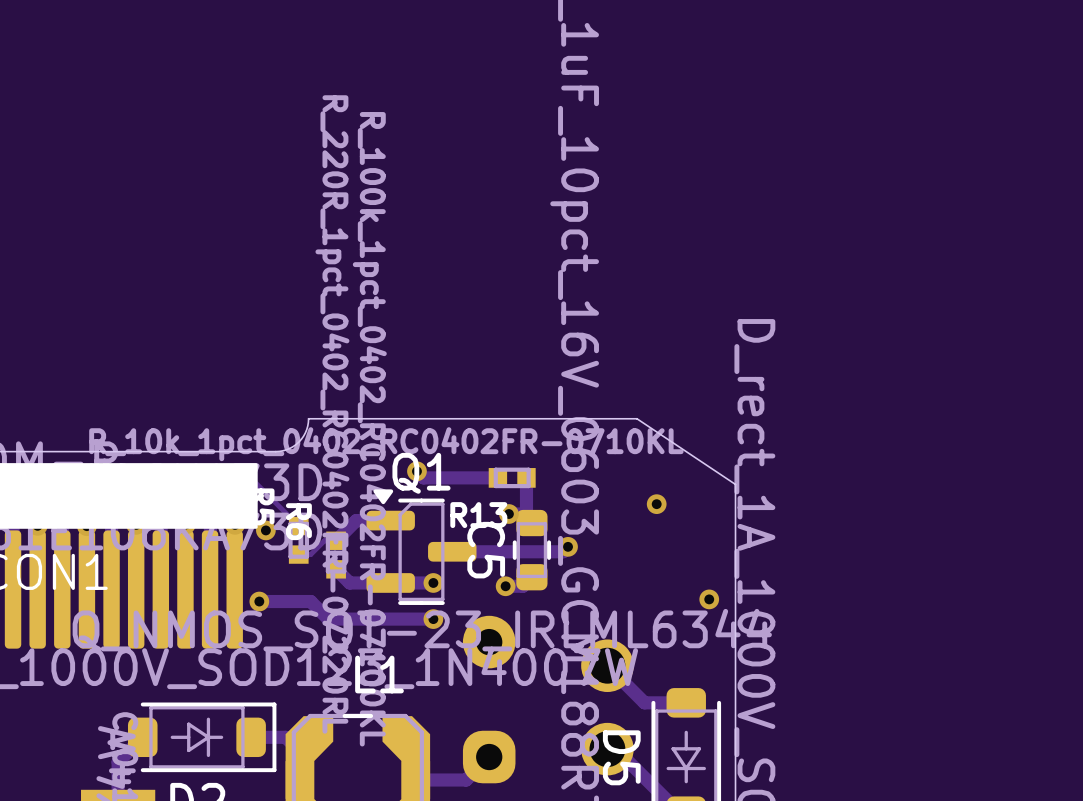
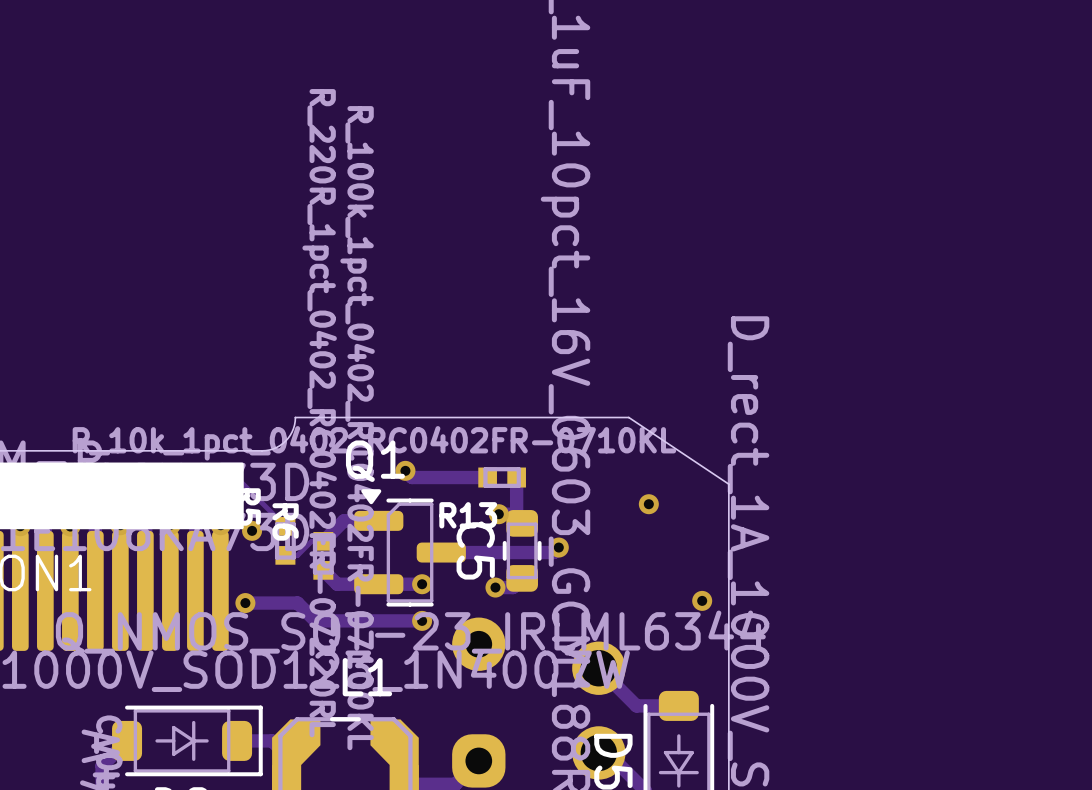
Q1 name position: Q1 (421, 473) -> Q1 (375, 461)

